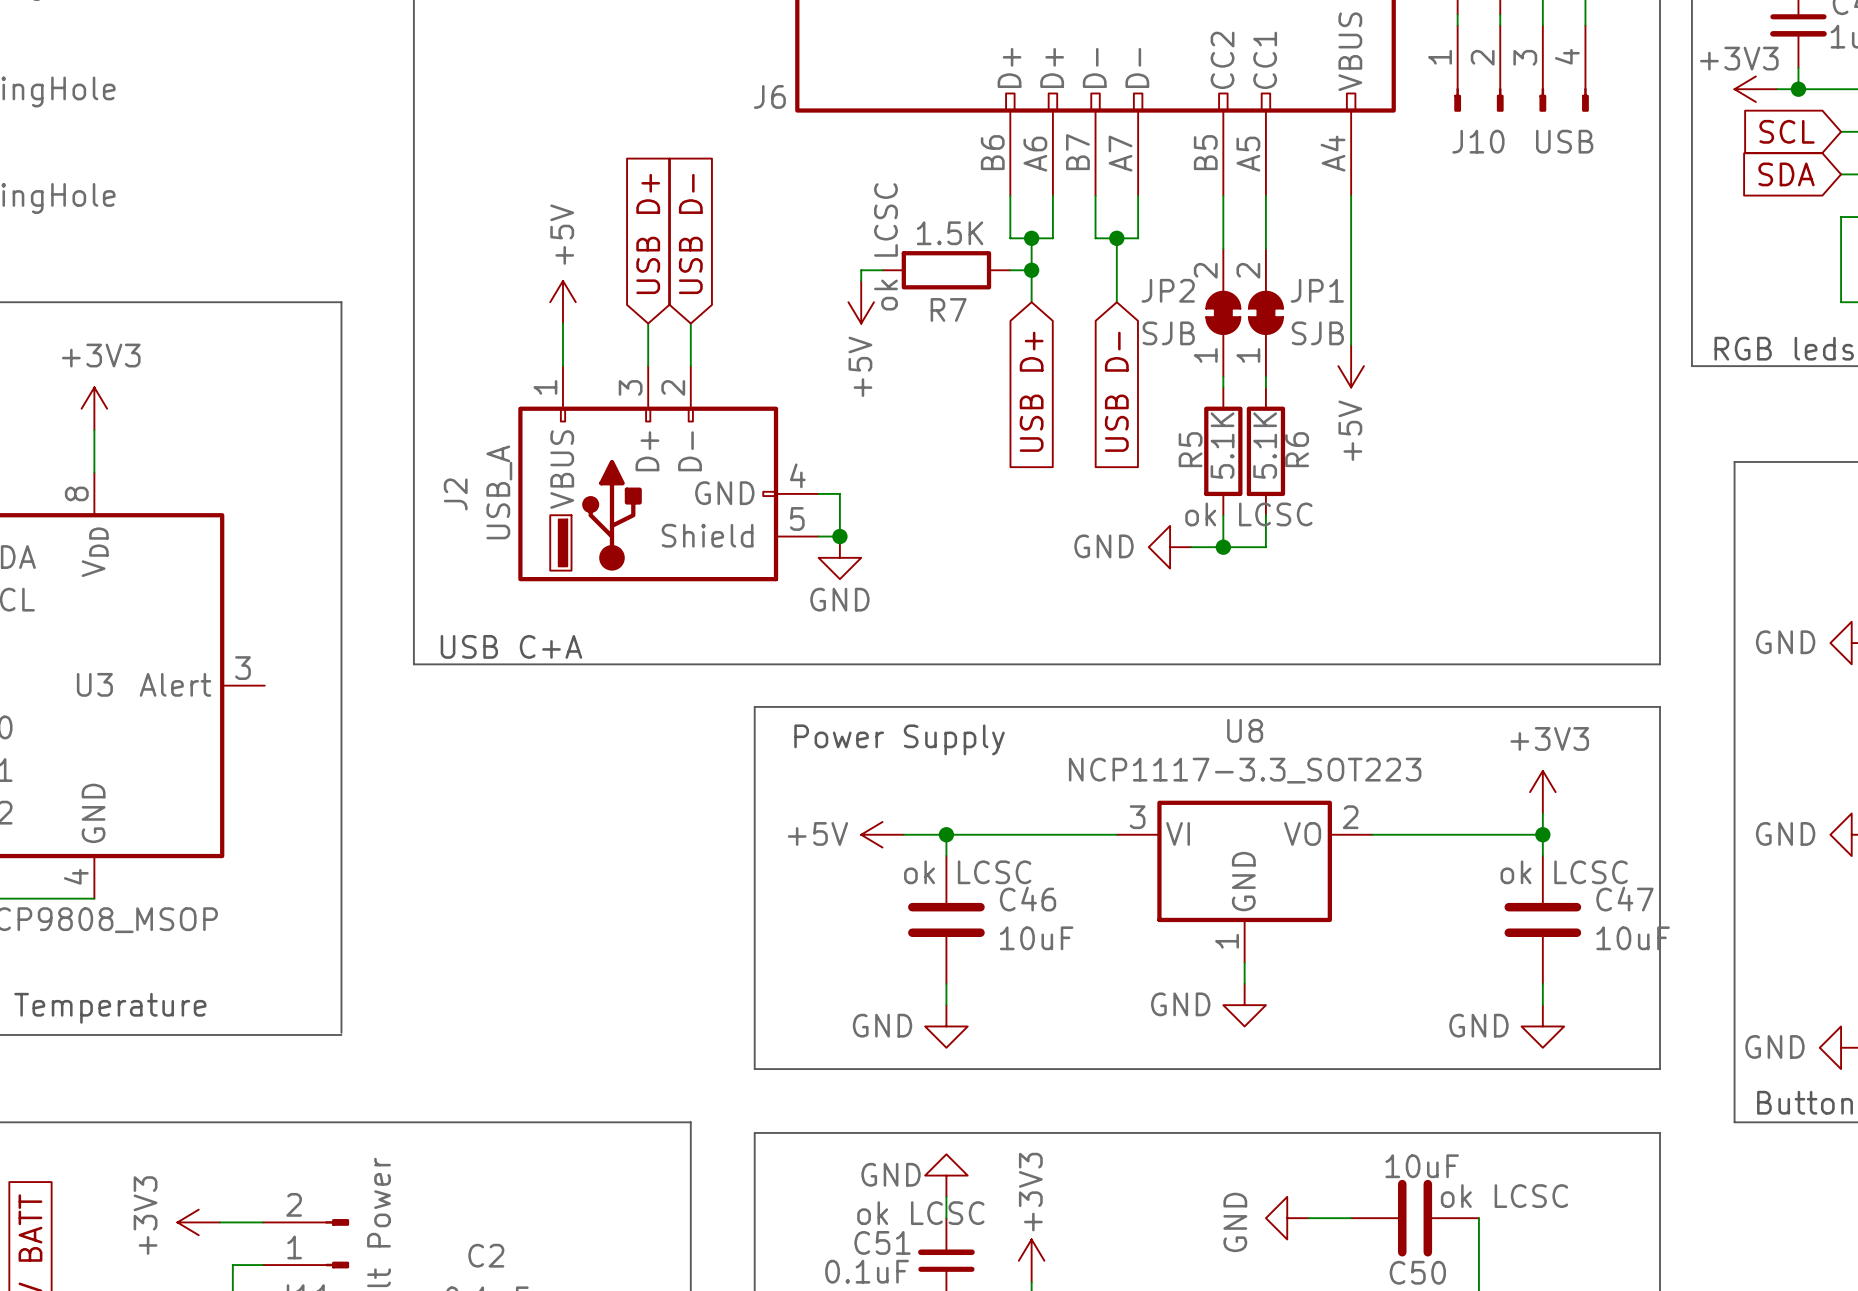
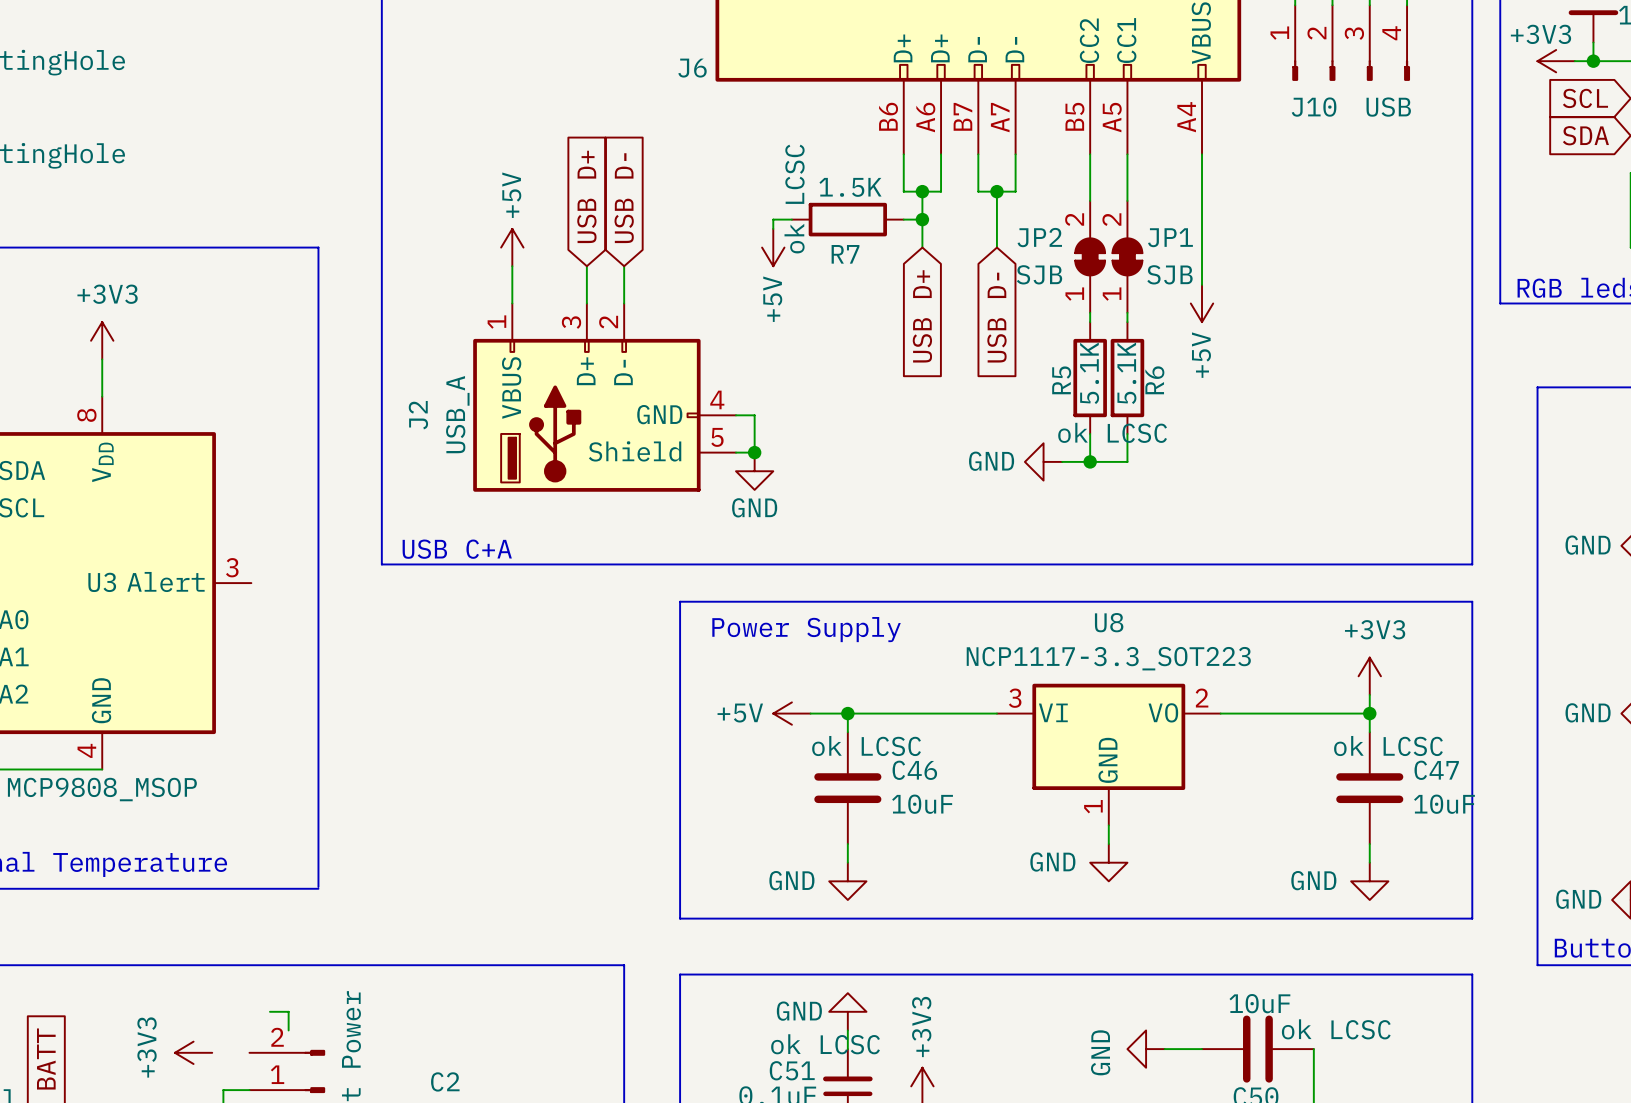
wire: none -> (270, 1011) (288, 1011) (288, 1030)
wire: (220, 1222) (262, 1222) -> none

